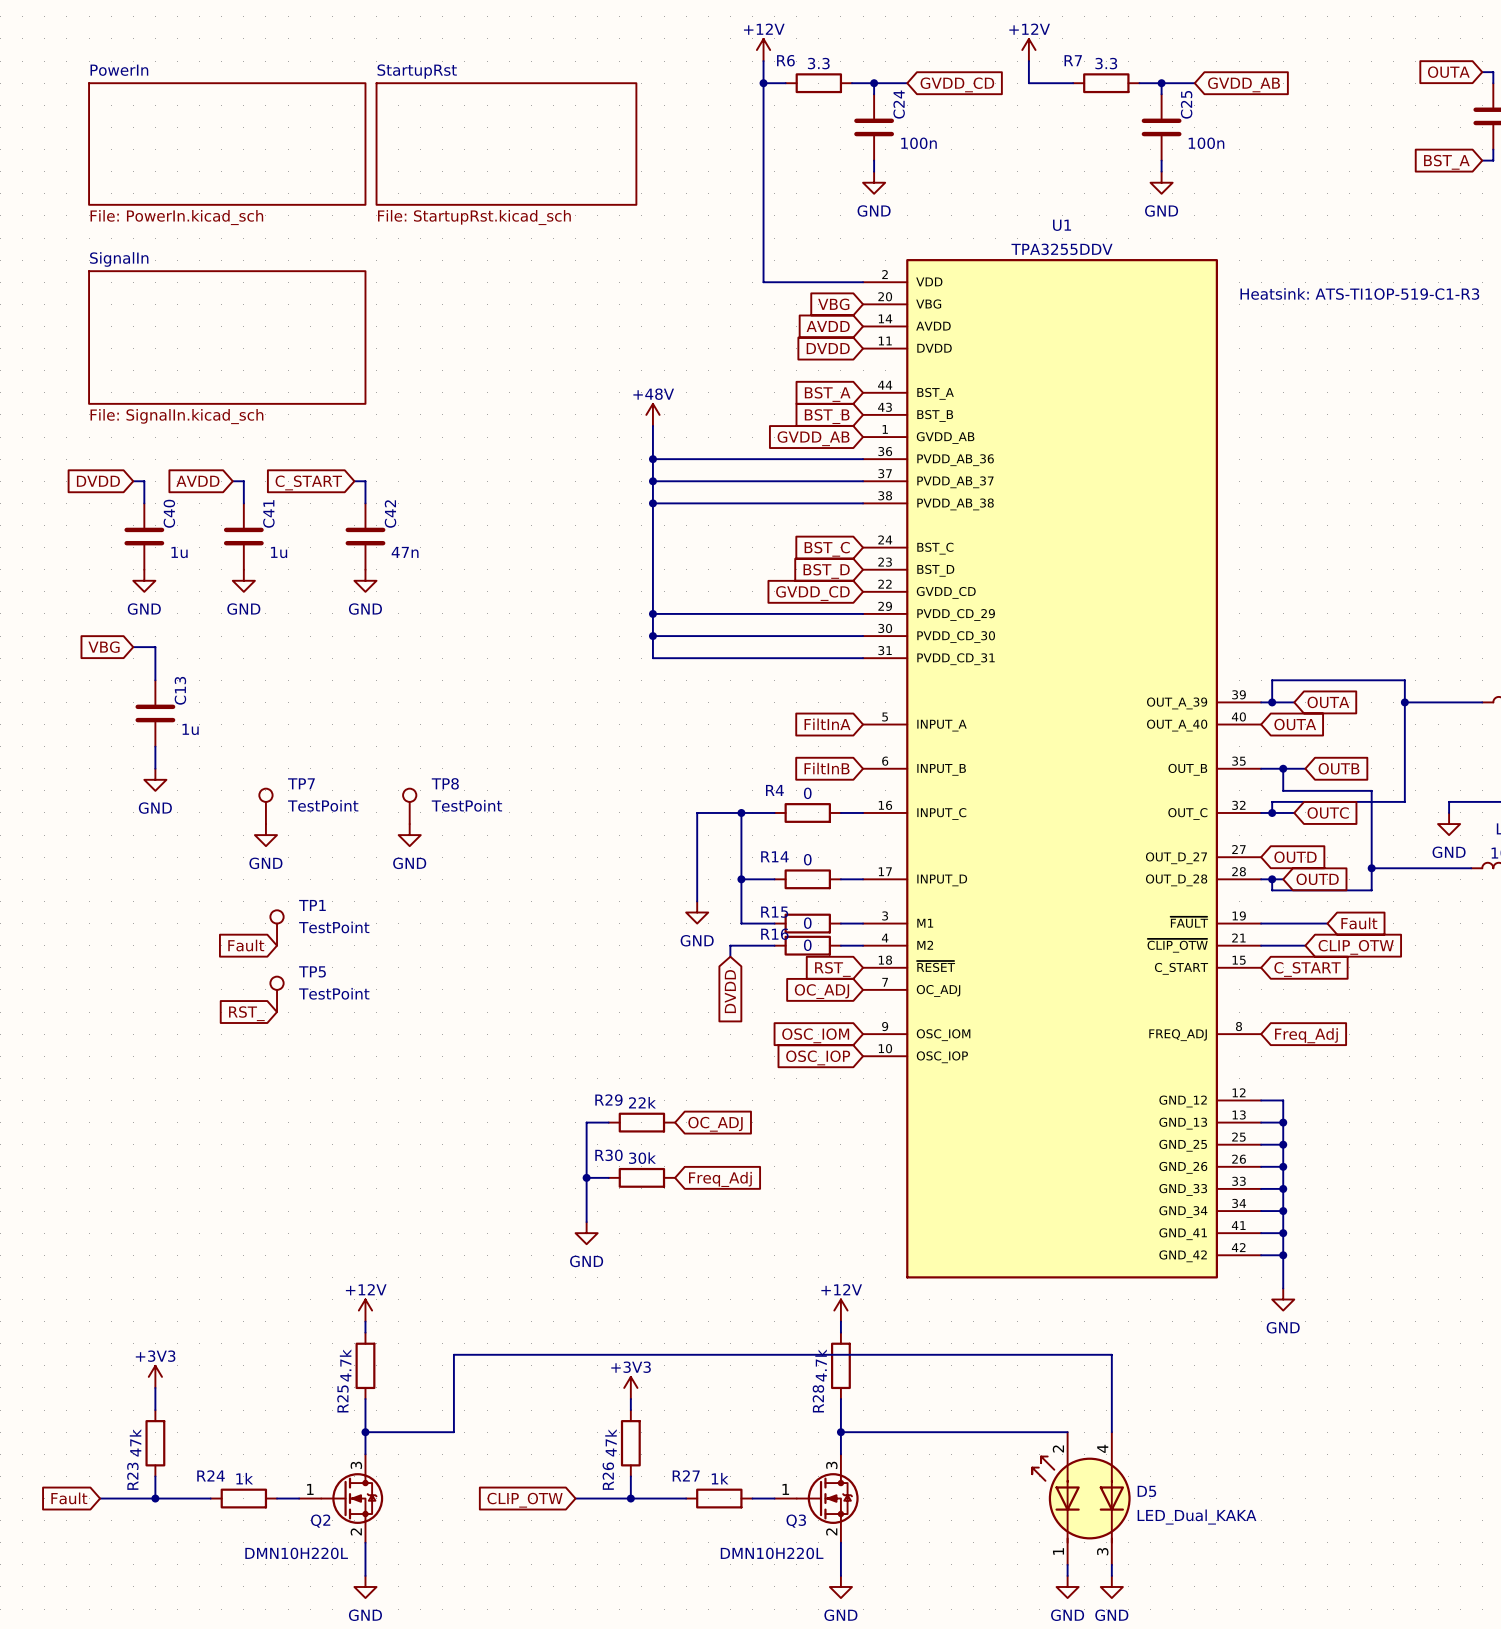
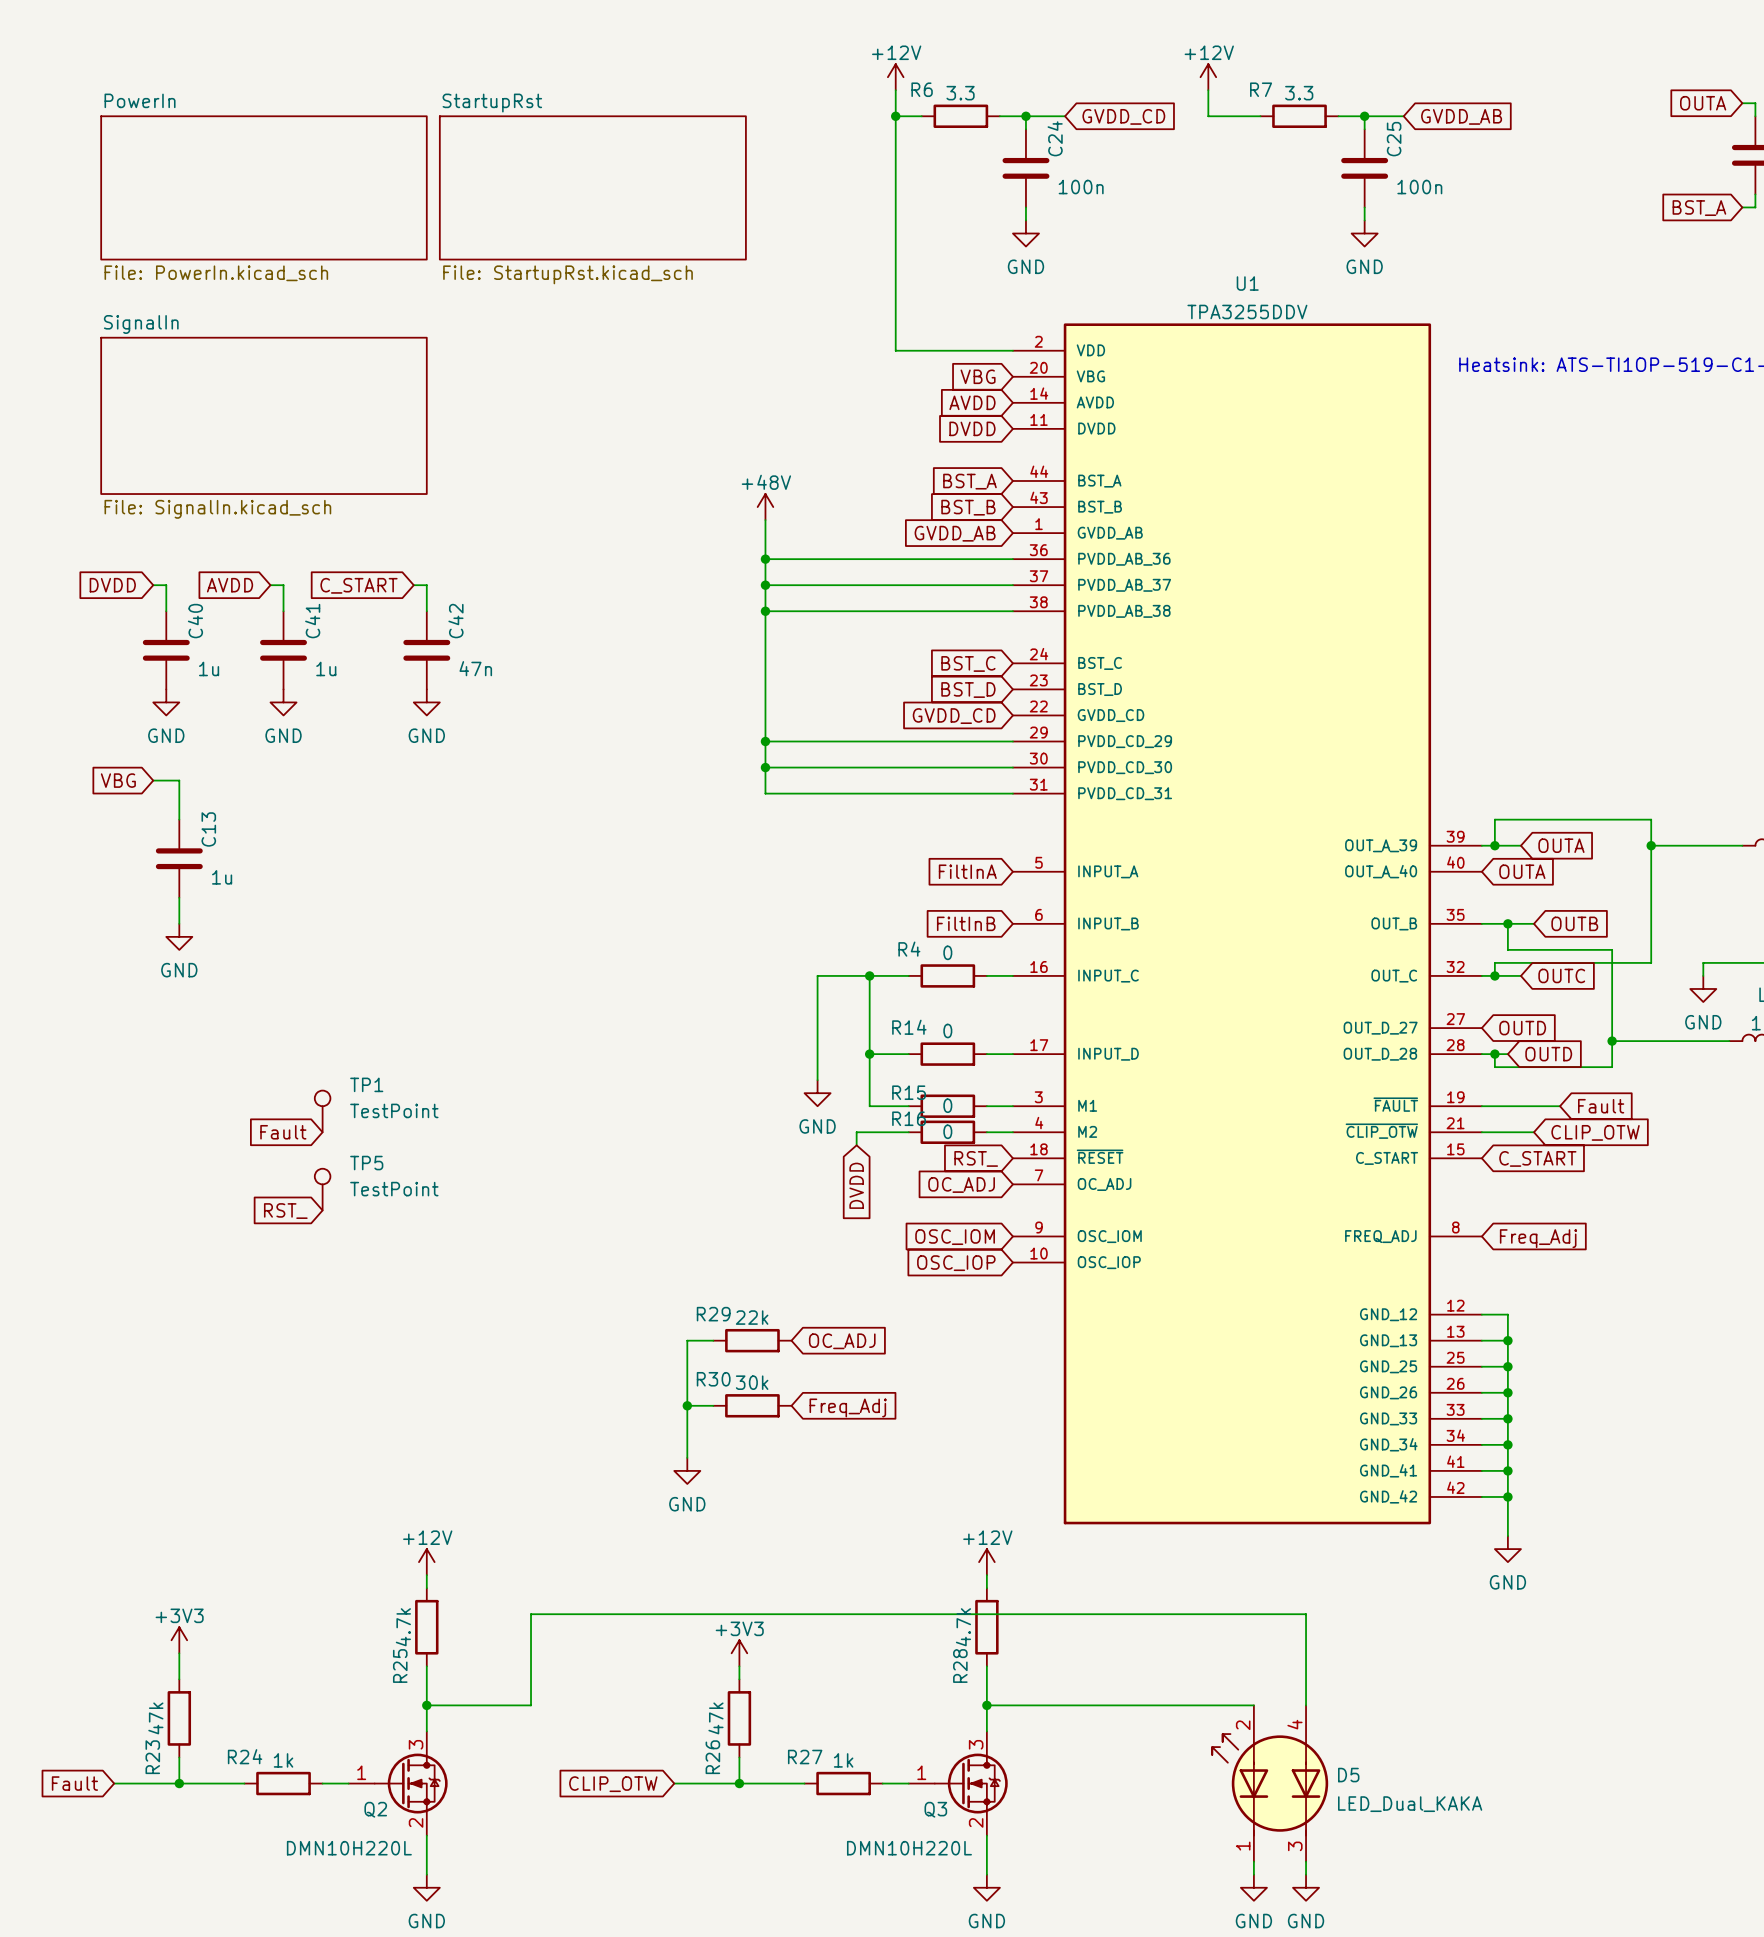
TP7: TestPoint (265, 806) -> none
TP8: TestPoint (409, 806) -> none
power symbol: GND (265, 835) -> none
power symbol: GND (409, 835) -> none

